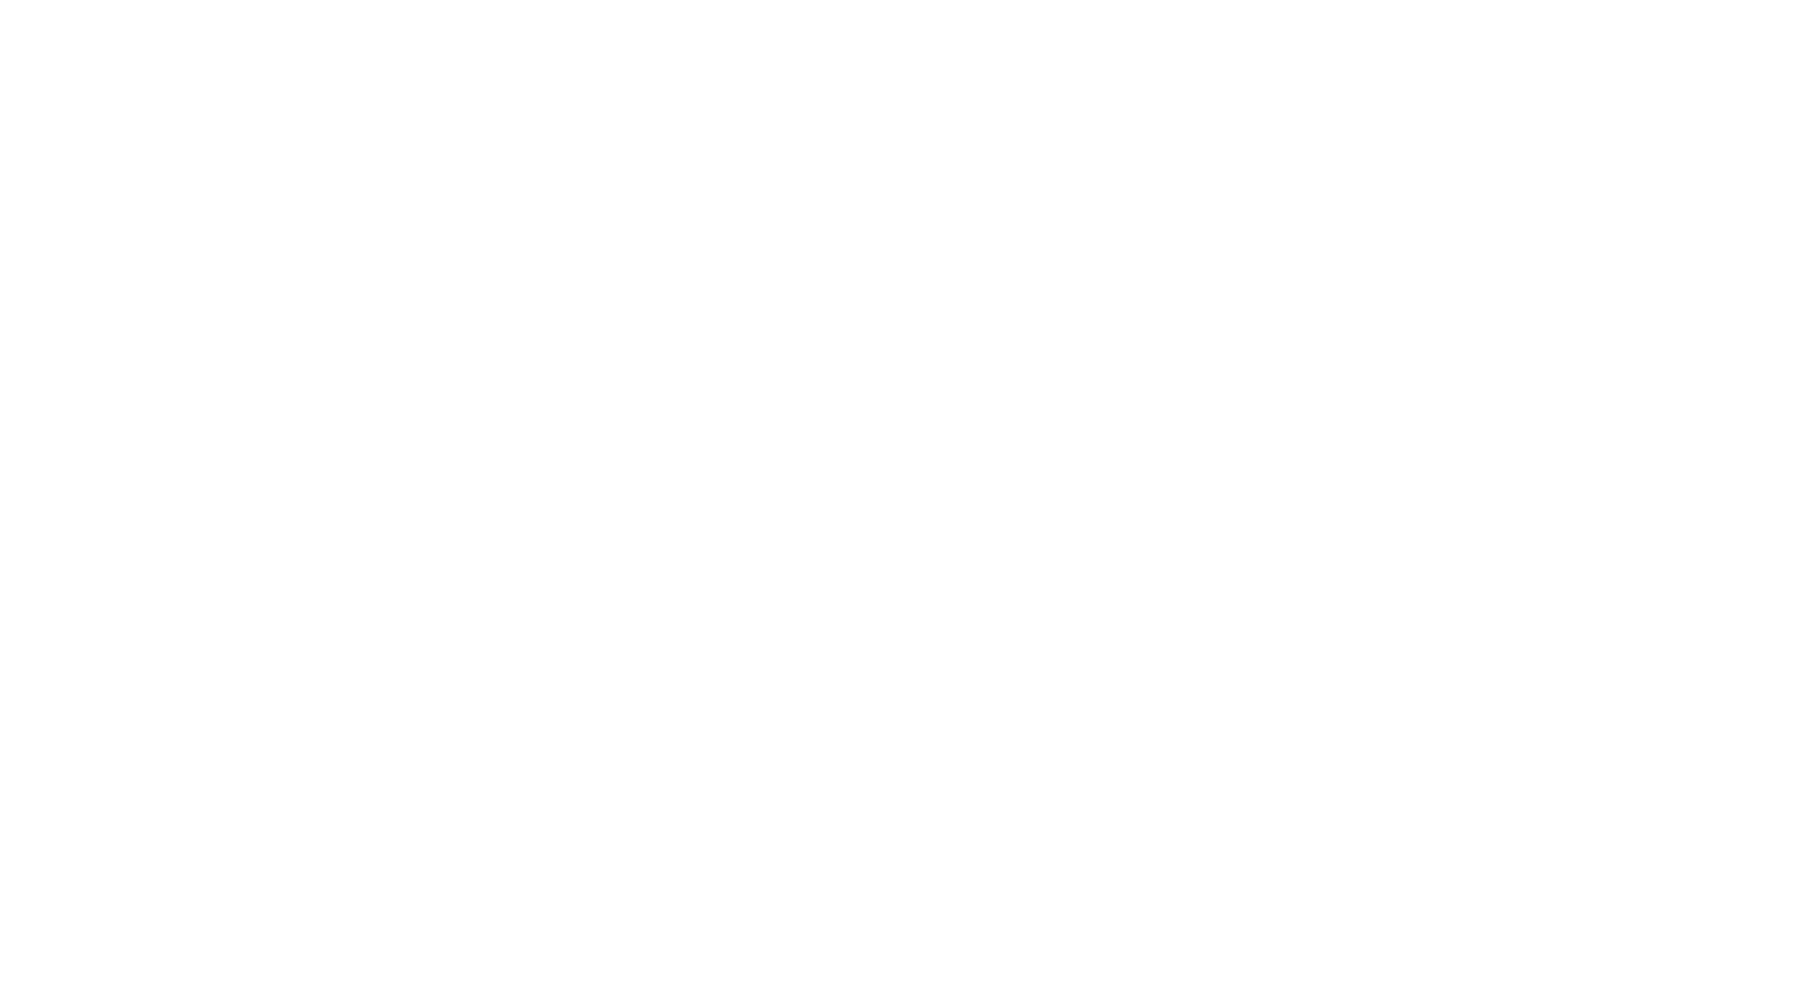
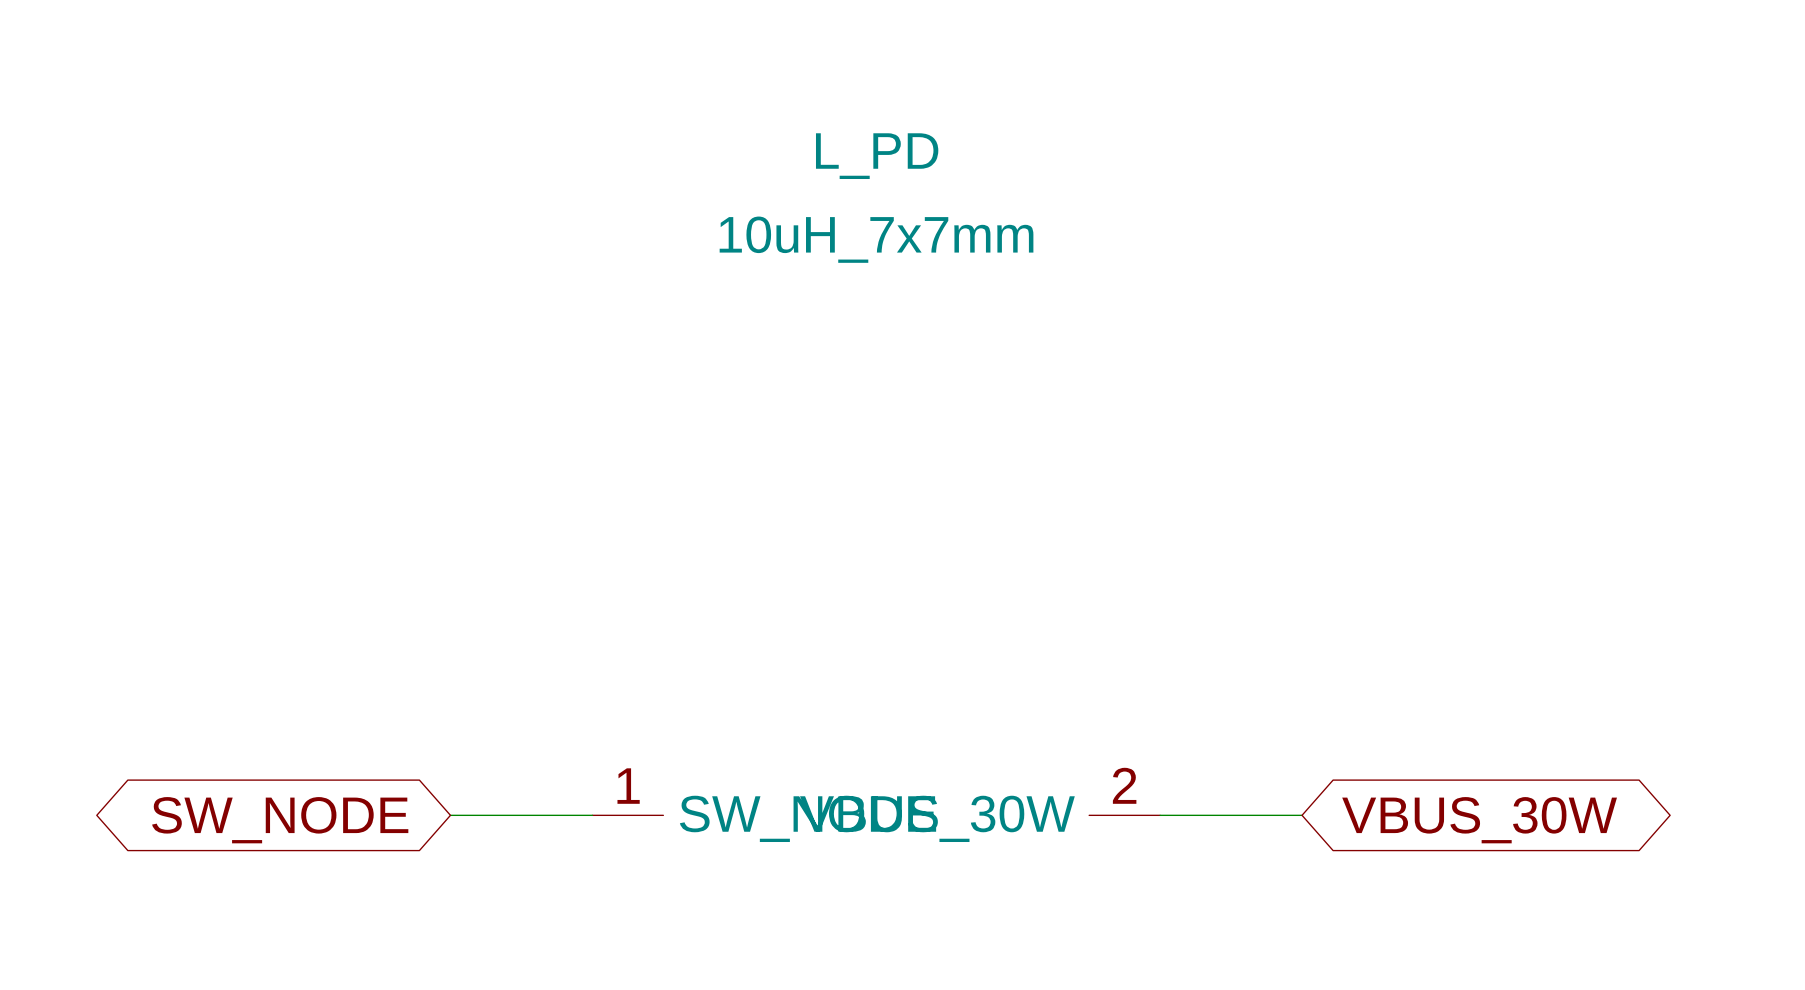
wire: none -> (450, 815) (592, 815)
L_PD: none -> 10uH_7x7mm (876, 815)
wire: none -> (1160, 815) (1302, 815)
global label: none -> SW_NODE (280, 820)
global label: none -> VBUS_30W (1479, 820)

